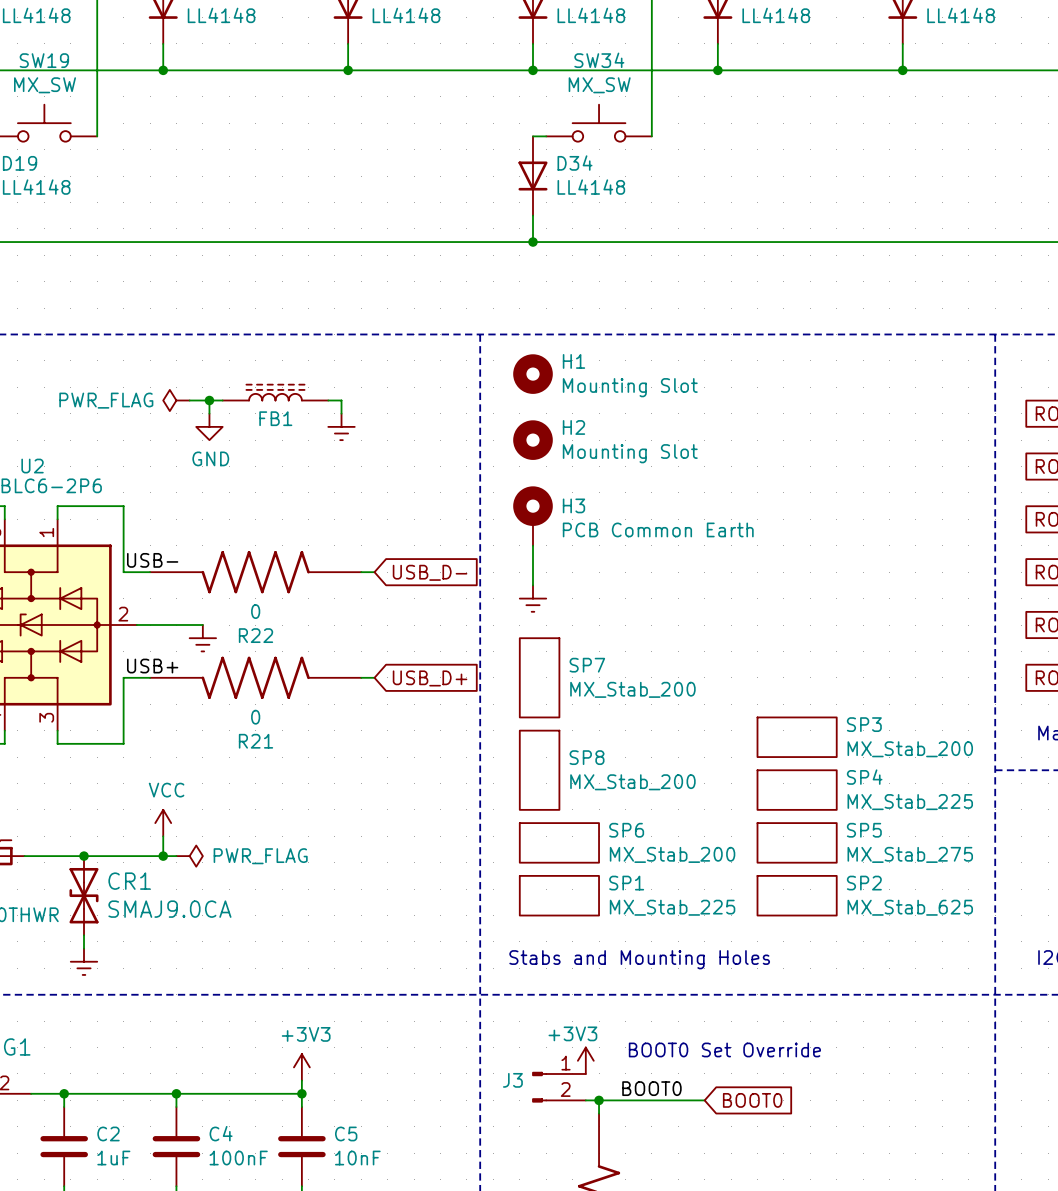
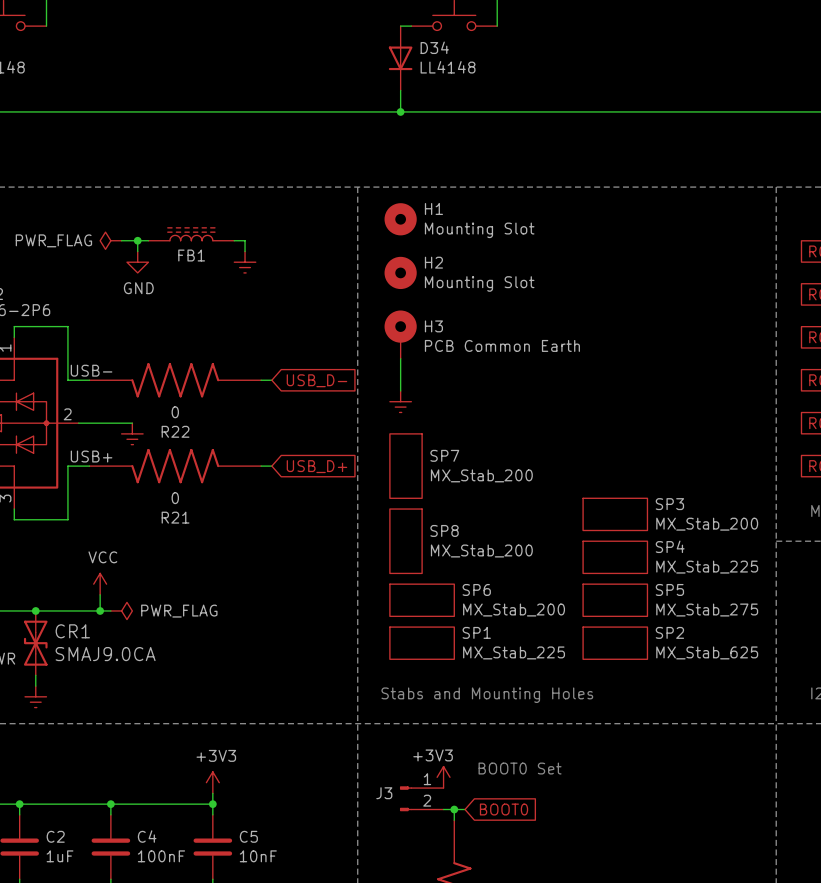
text: BOOT0 Set Override (724, 1049) -> BOOT0 Set (520, 768)
label: BOOT0 (651, 1088) -> none
wire: (612, 1100) (704, 1100) -> none
global label position: BOOT0 (752, 1100) -> BOOT0 (504, 809)

